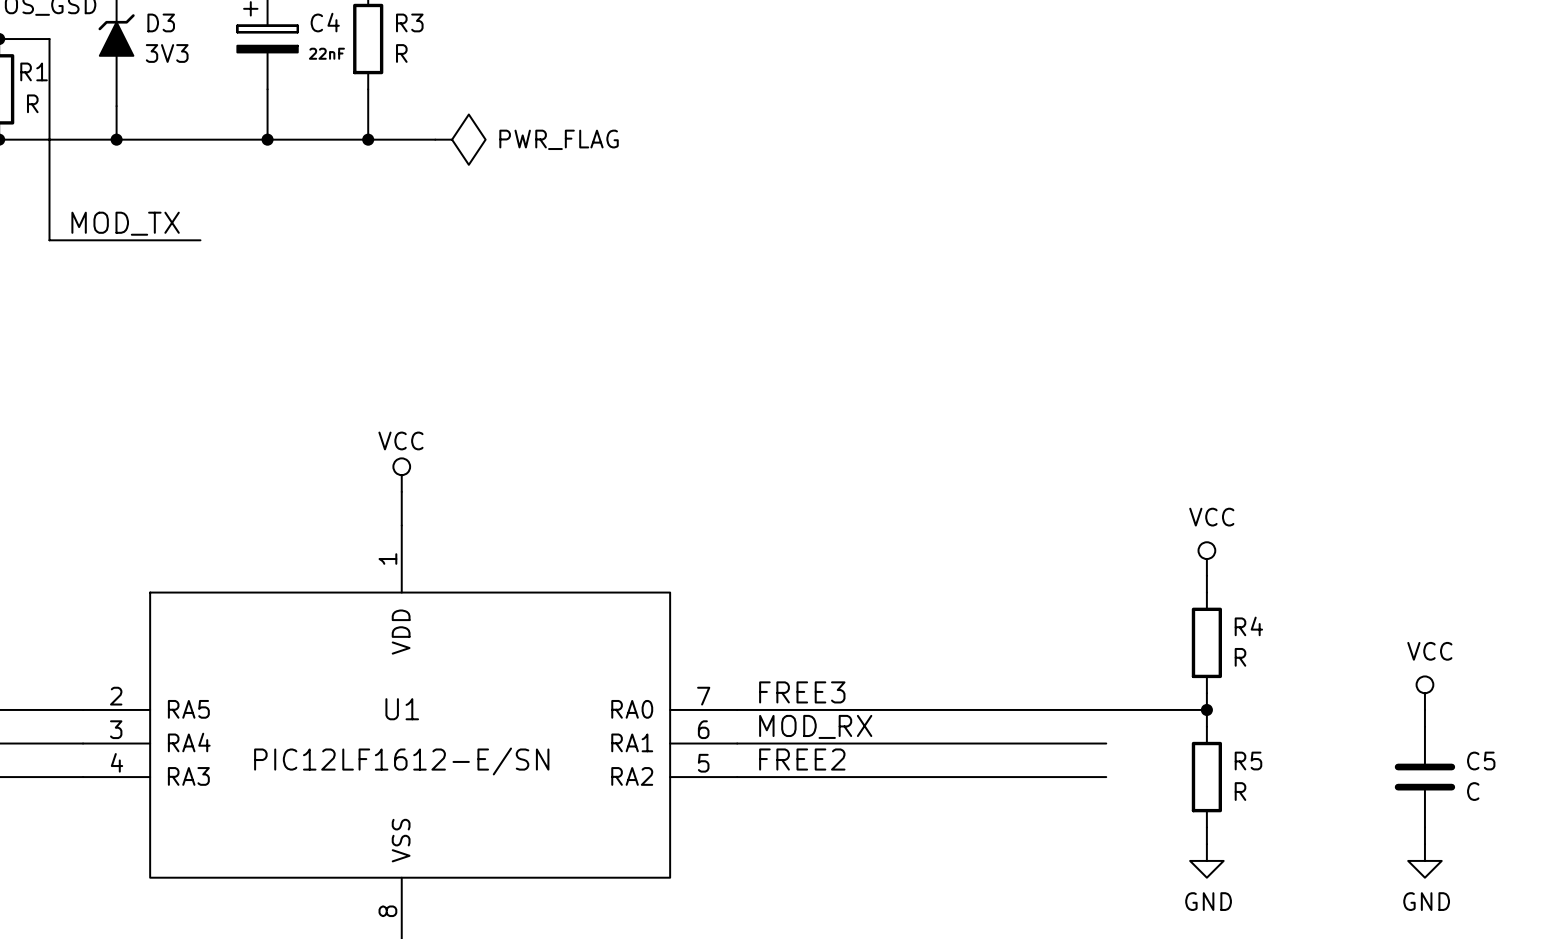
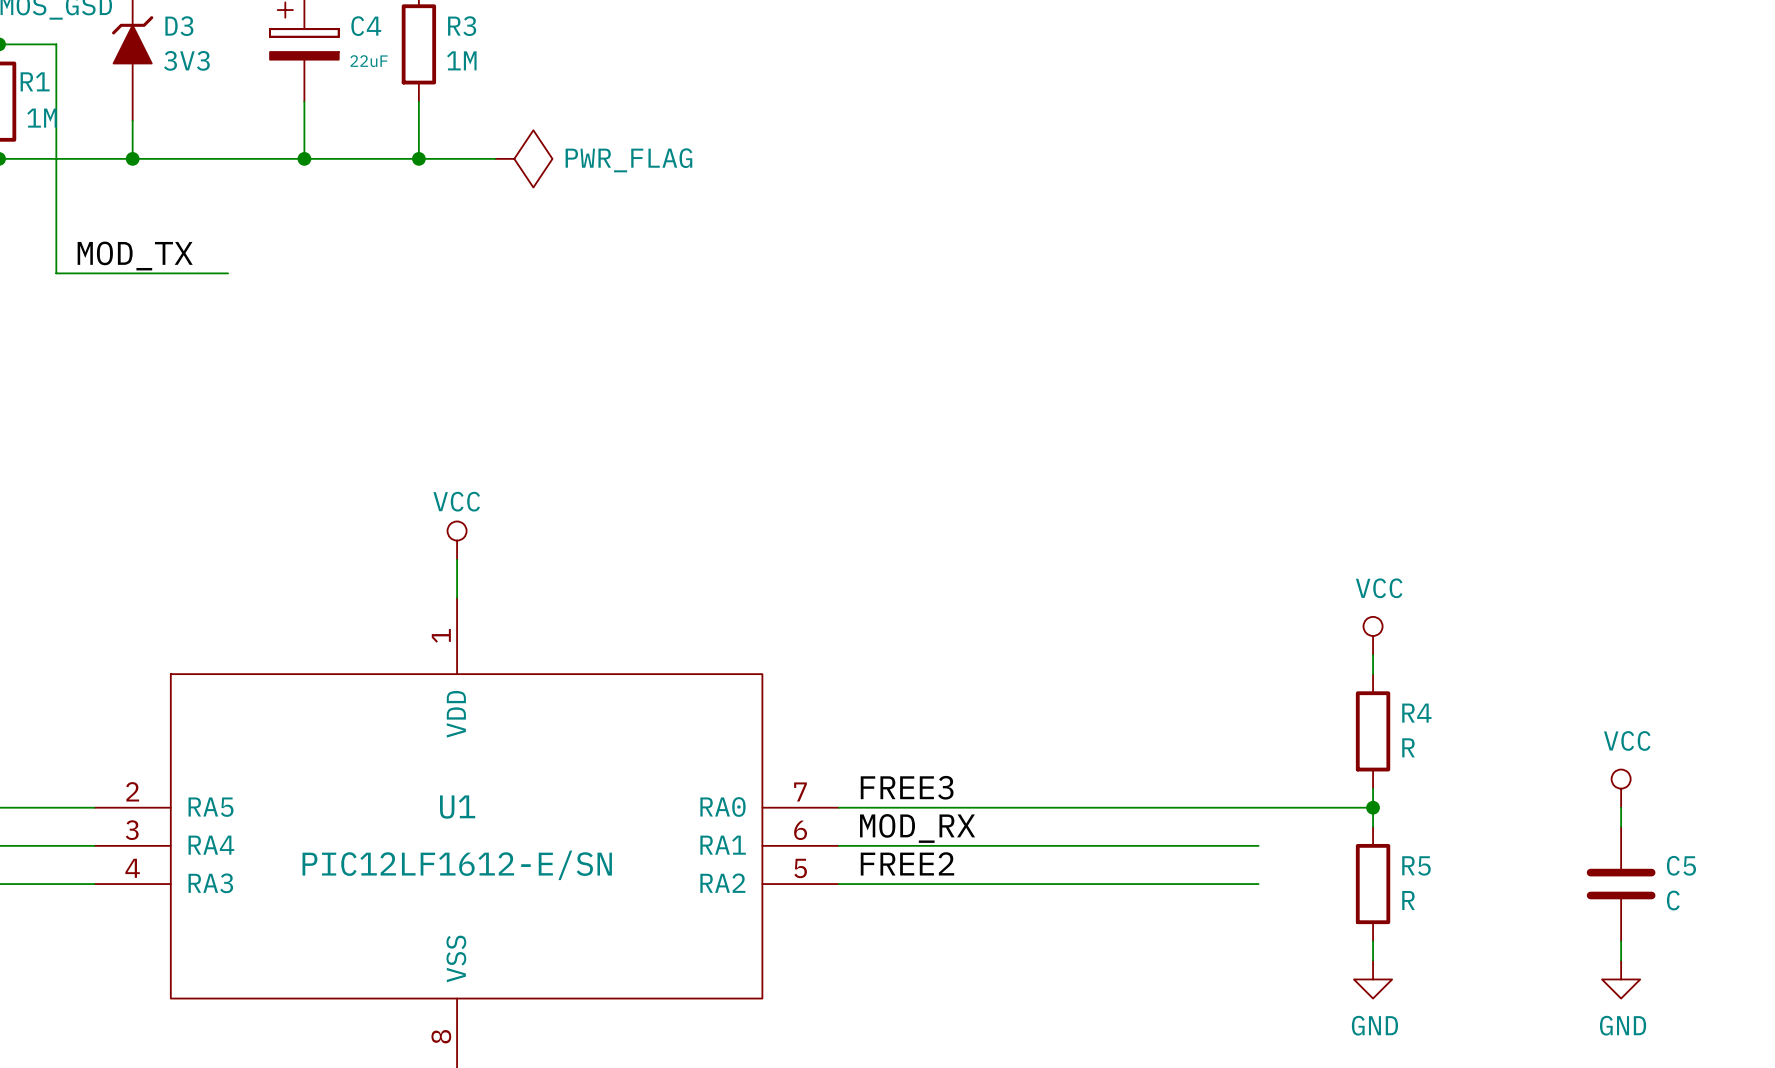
C4 value: 22nF (326, 53) -> 22uF (369, 61)
R3 value: R (401, 53) -> 1M (461, 60)
R1 value: R (32, 103) -> 1M (41, 118)

